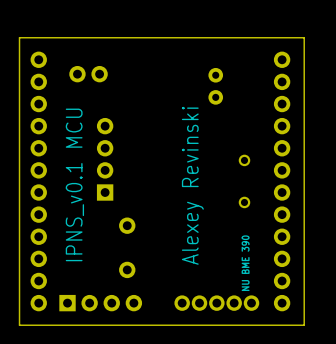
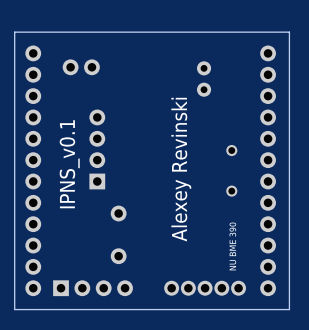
text: IPNS_v0.1 MCU (74, 184) -> IPNS_v0.1 (69, 164)

